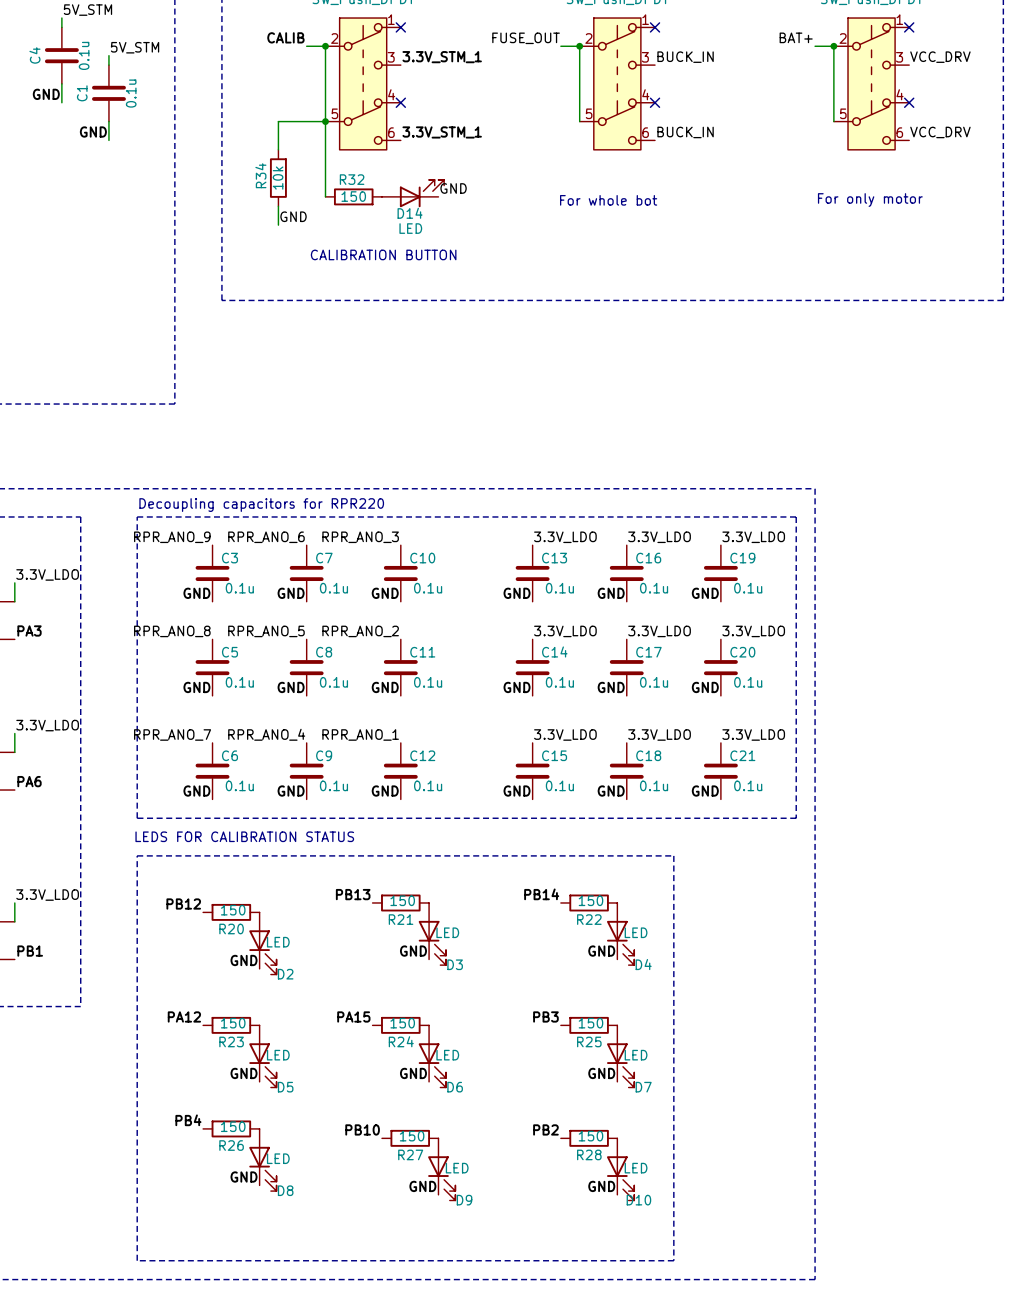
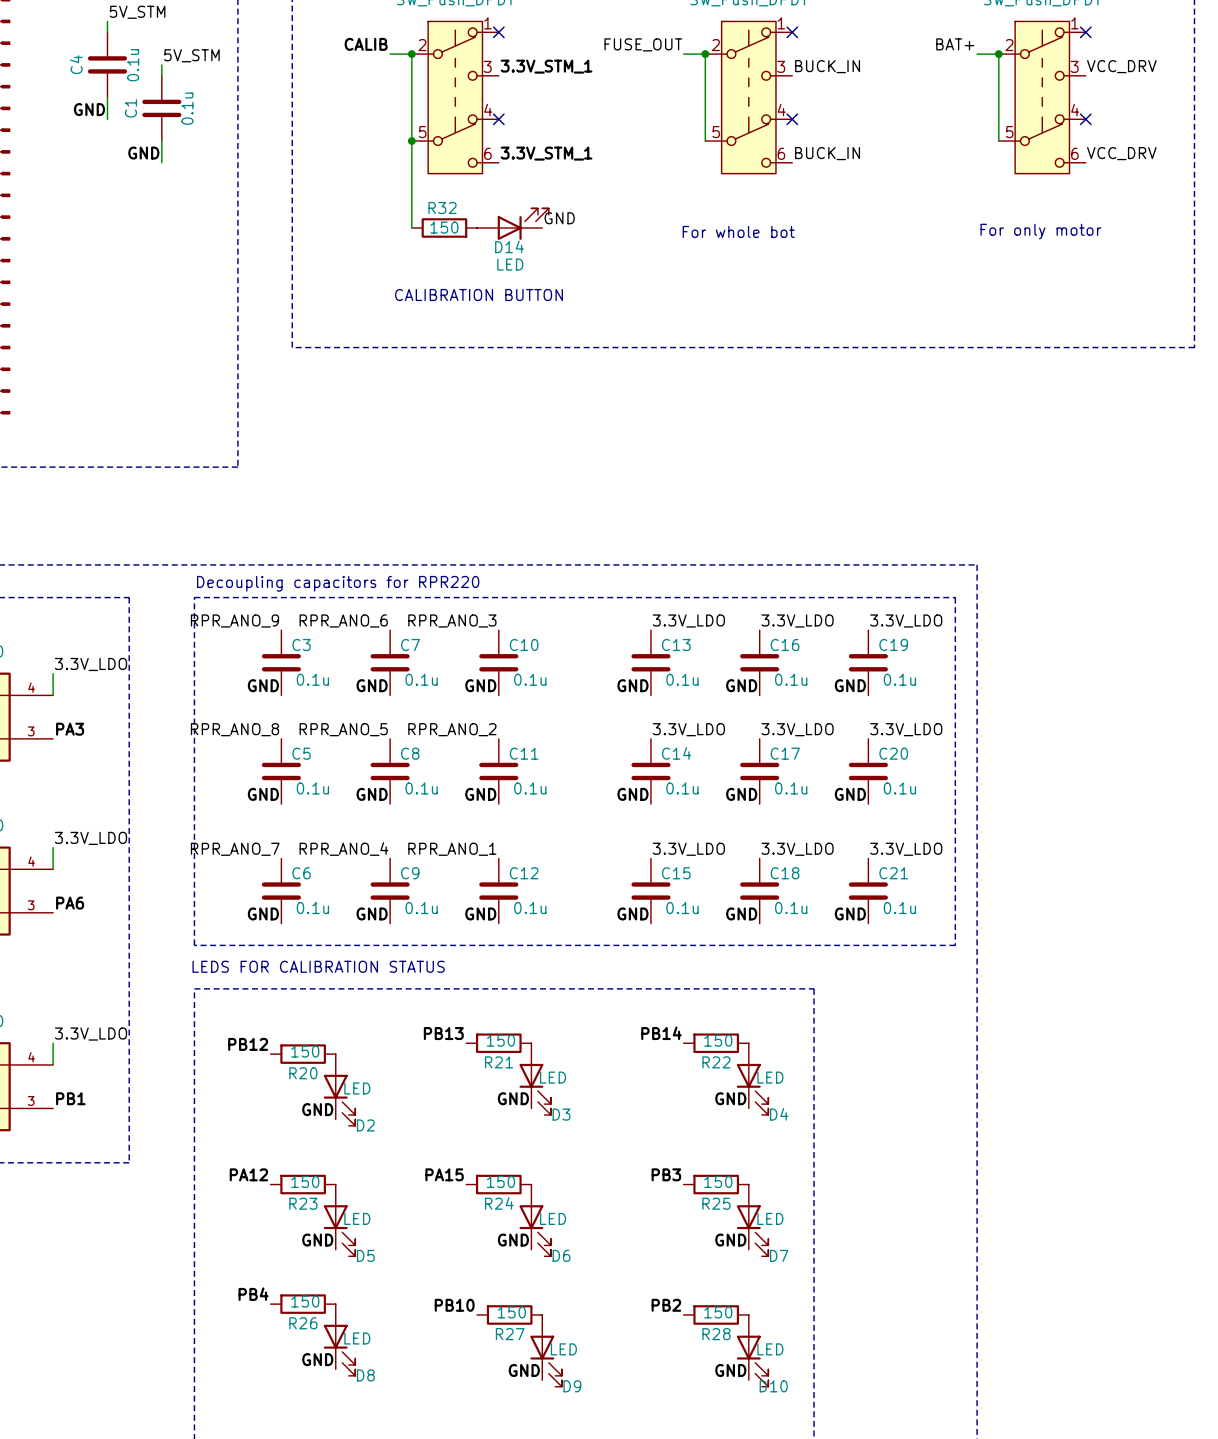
wire: (325, 121) (278, 121) (278, 149) -> none
R34: 10k (278, 178) -> none
wire: (278, 206) (278, 225) -> none
label: GND (293, 216) -> none

